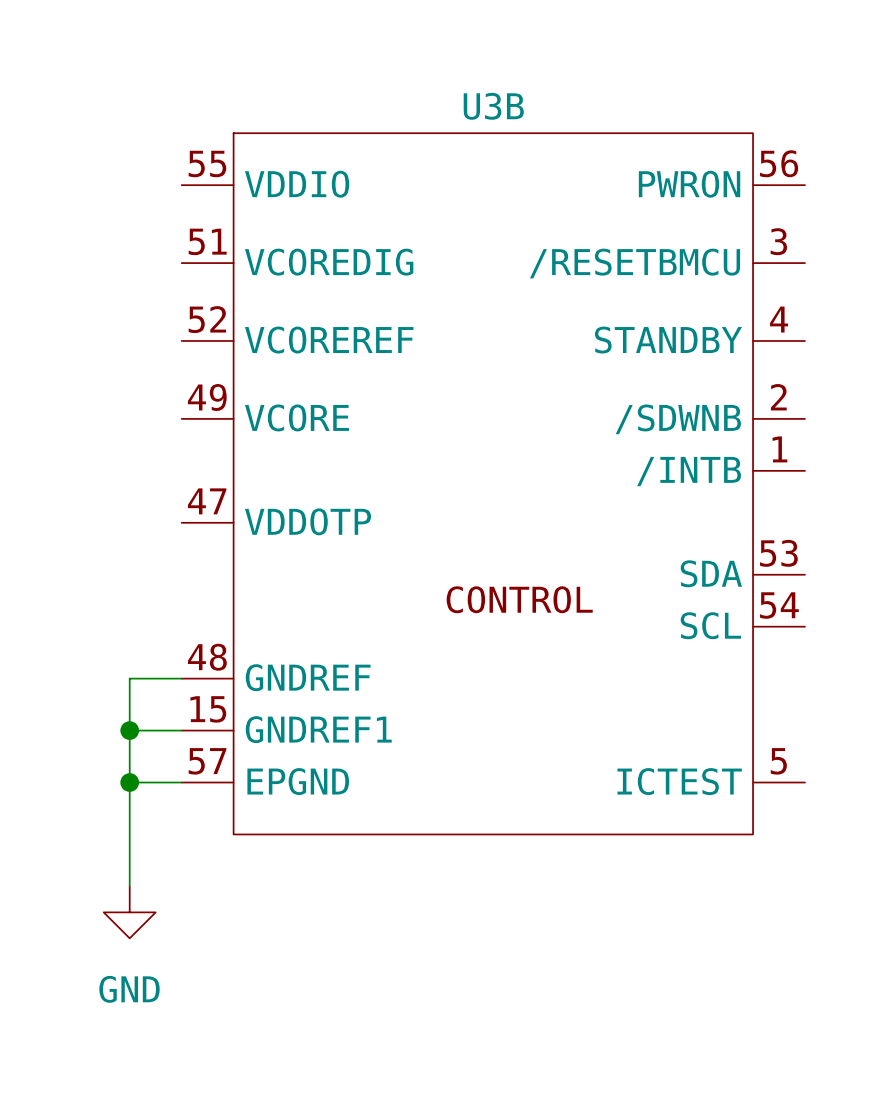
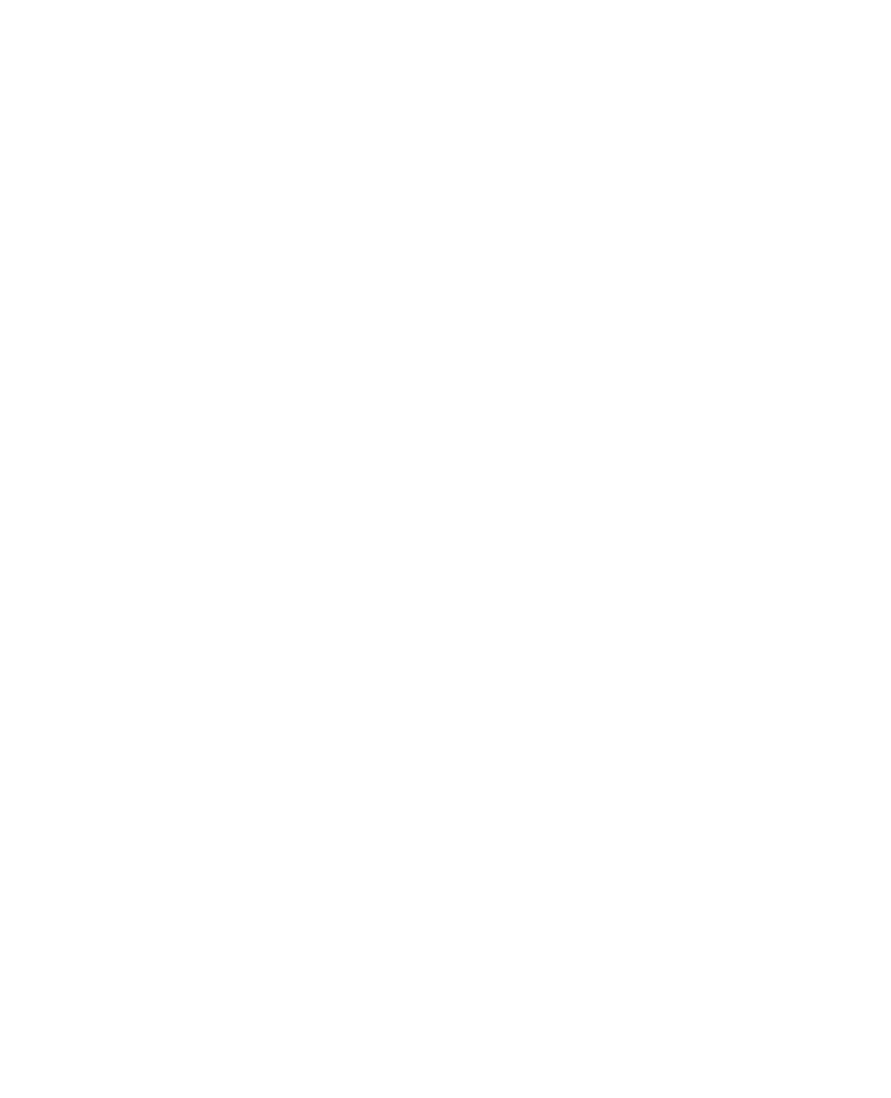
U3B: (493, 483) -> none
wire: (181, 678) (129, 678) (129, 886) -> none
wire: (129, 730) (181, 730) -> none
junction: (129, 730) -> none
wire: (129, 782) (181, 782) -> none
junction: (129, 782) -> none
power symbol: GND (129, 912) -> none

